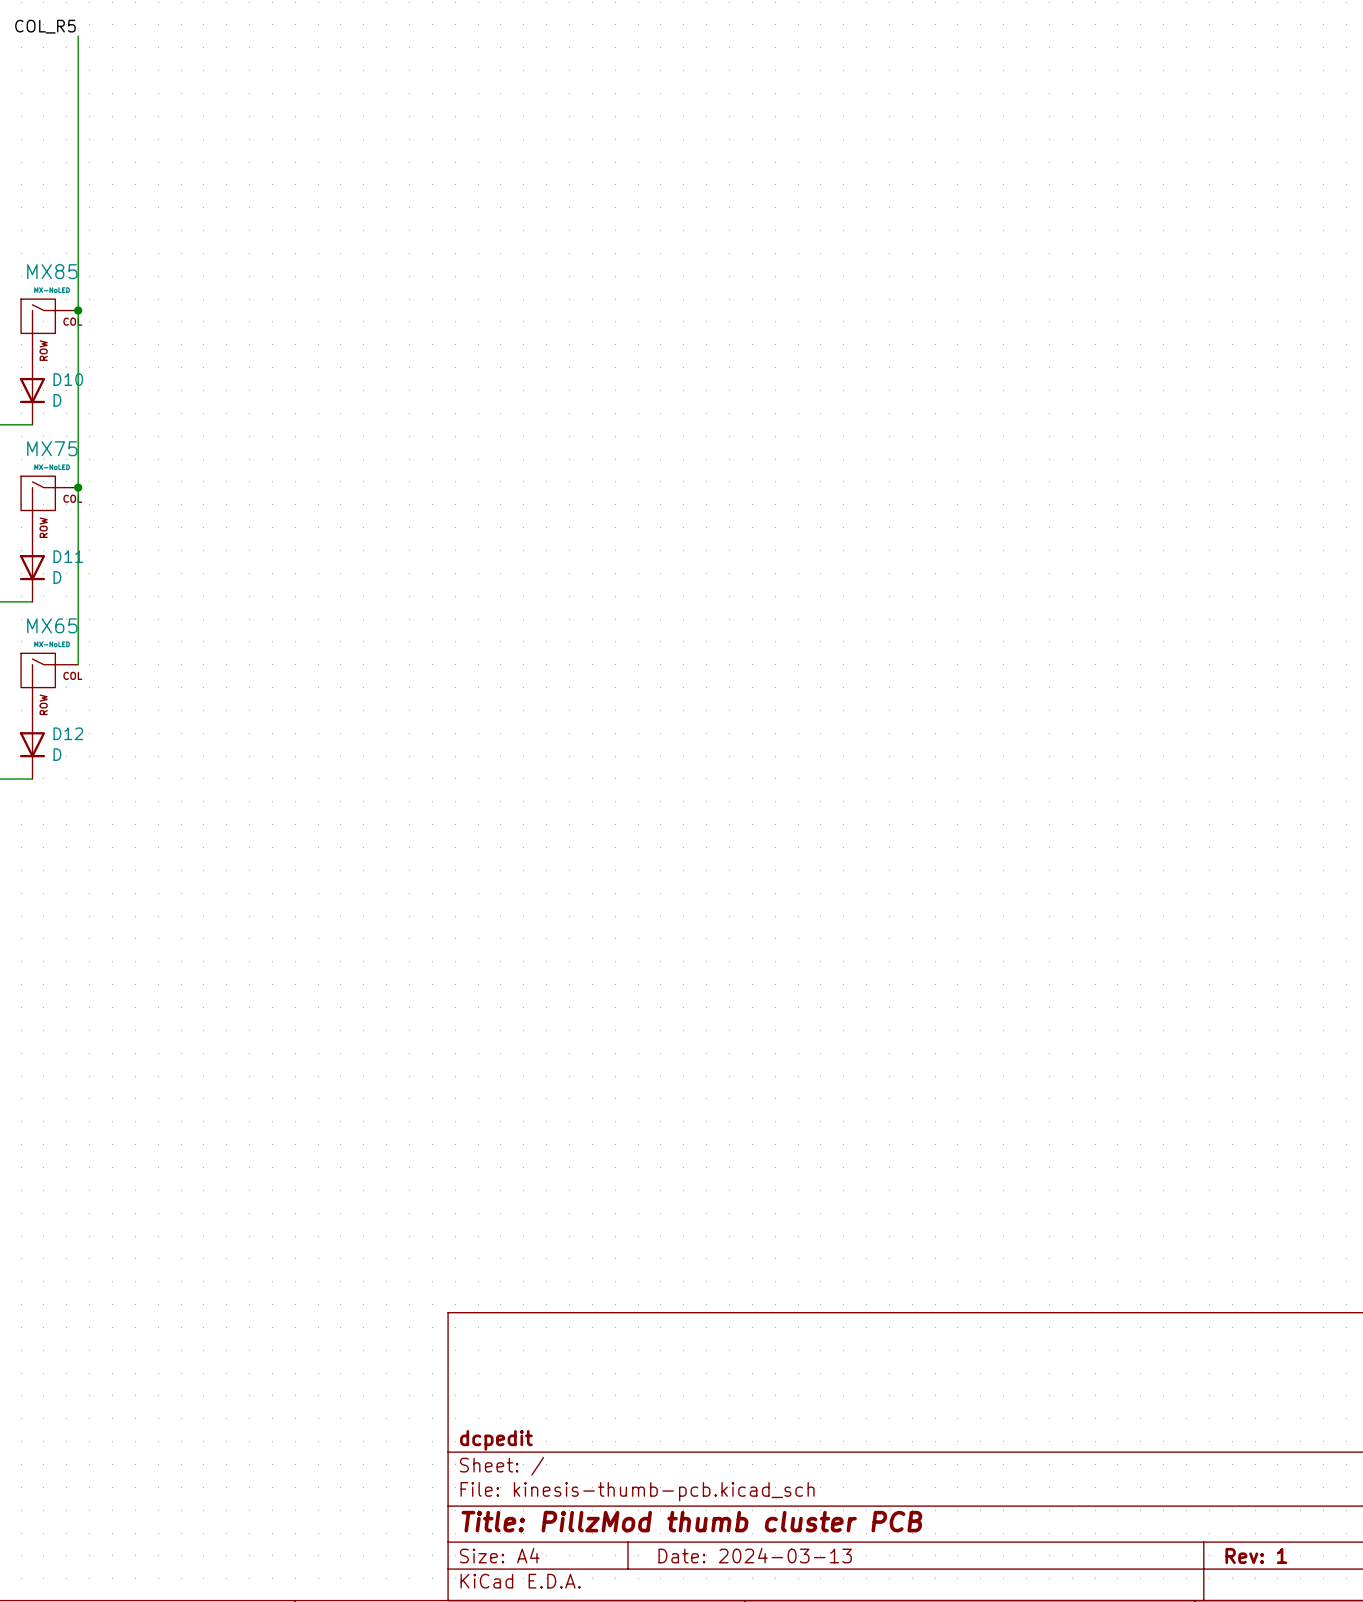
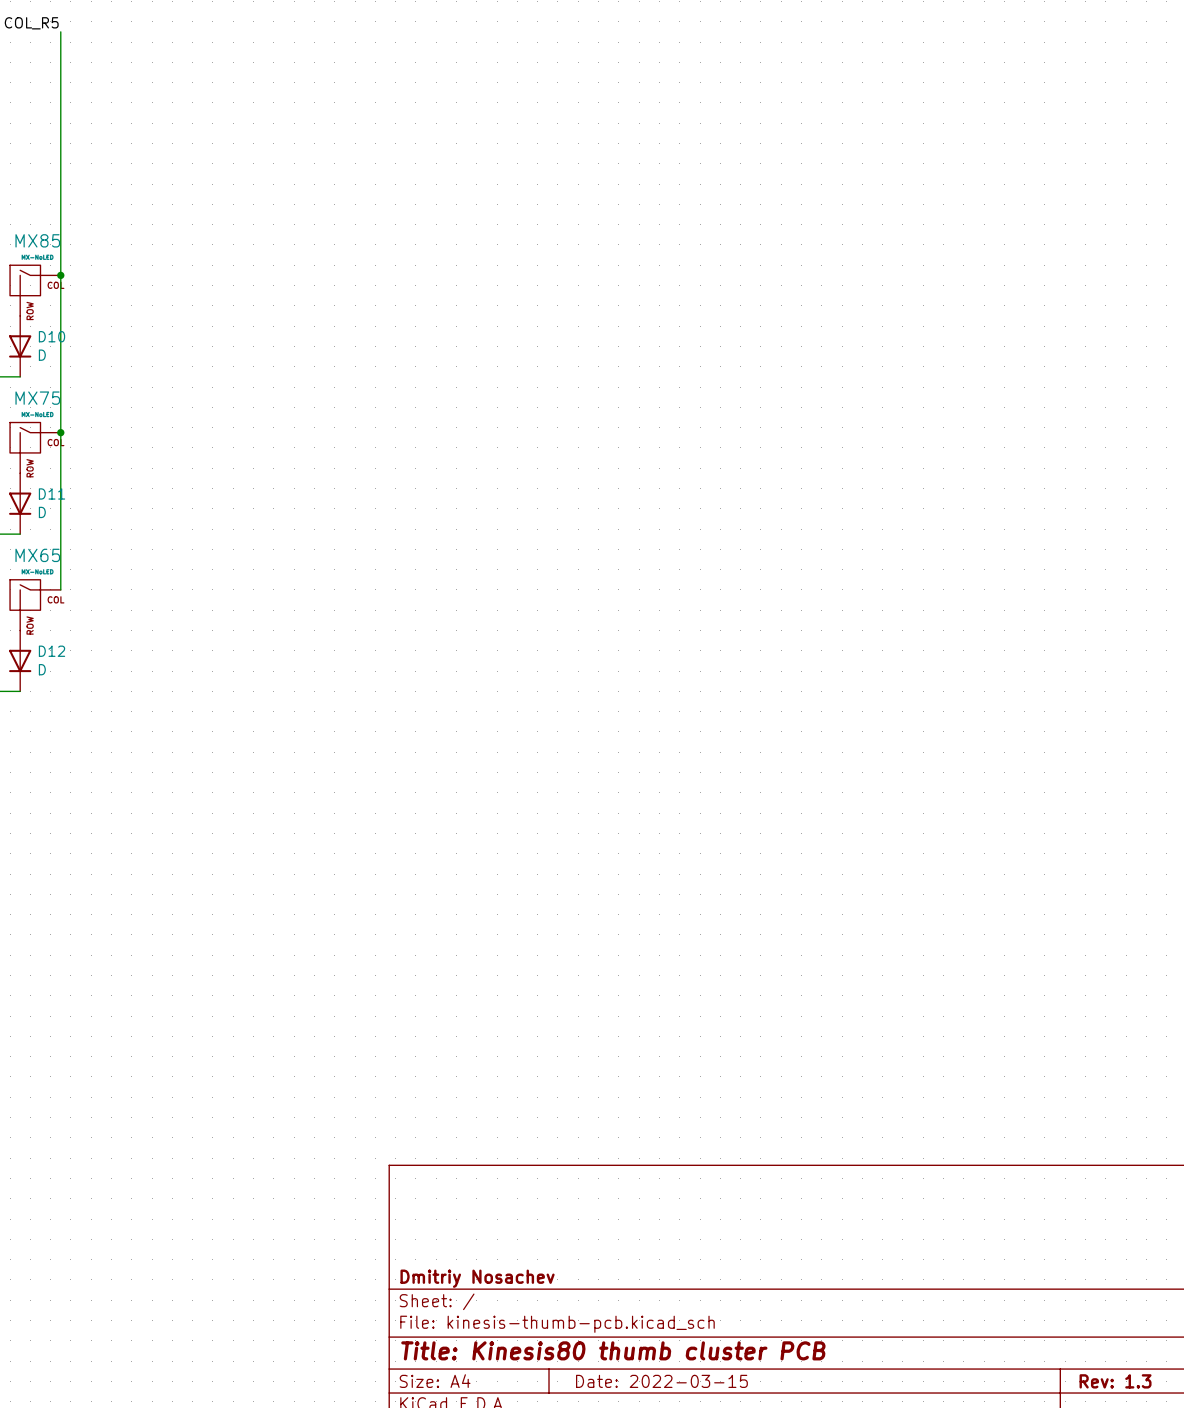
title block: dcpedit (496, 1440) -> Dmitriy Nosachev (477, 1278)
title block: Title: PillzMod thumb cluster PCB (691, 1521) -> Title: Kinesis80 thumb cluster PCB (613, 1350)
title block: Date: 2024-03-13 (755, 1555) -> Date: 2022-03-15 (661, 1381)
title block: Rev: 1 (1256, 1555) -> Rev: 1.3 (1115, 1381)

